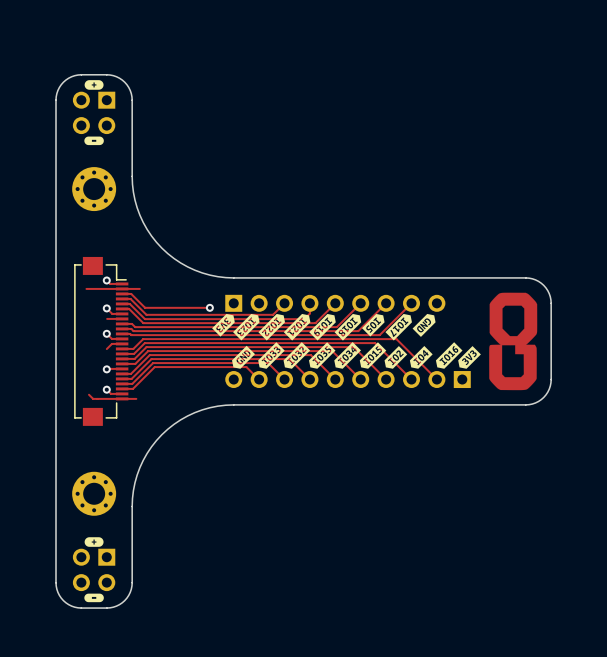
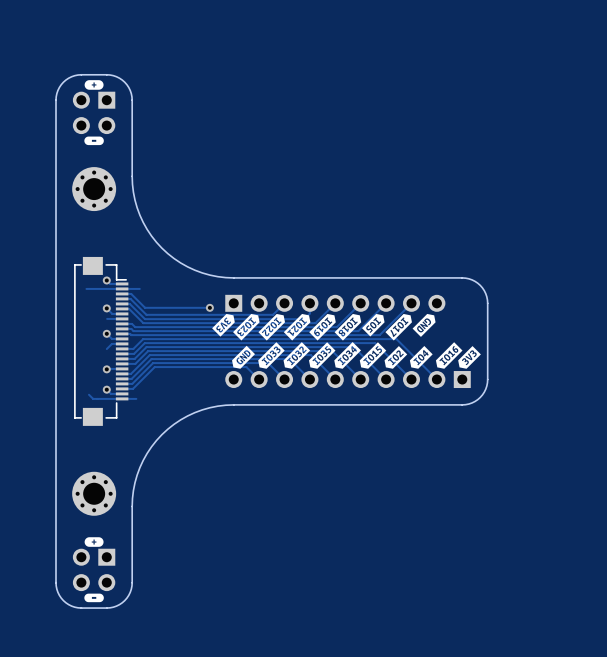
board edge: (462, 277) (532, 278) (545, 287) (551, 303) (551, 379) (545, 394) (538, 401) (529, 404) (462, 404) -> (462, 277) (472, 279) (480, 285) (485, 293) (487, 303) (486, 386) (477, 399) (462, 404)
drawing: [489, 292, 538, 391] -> none

